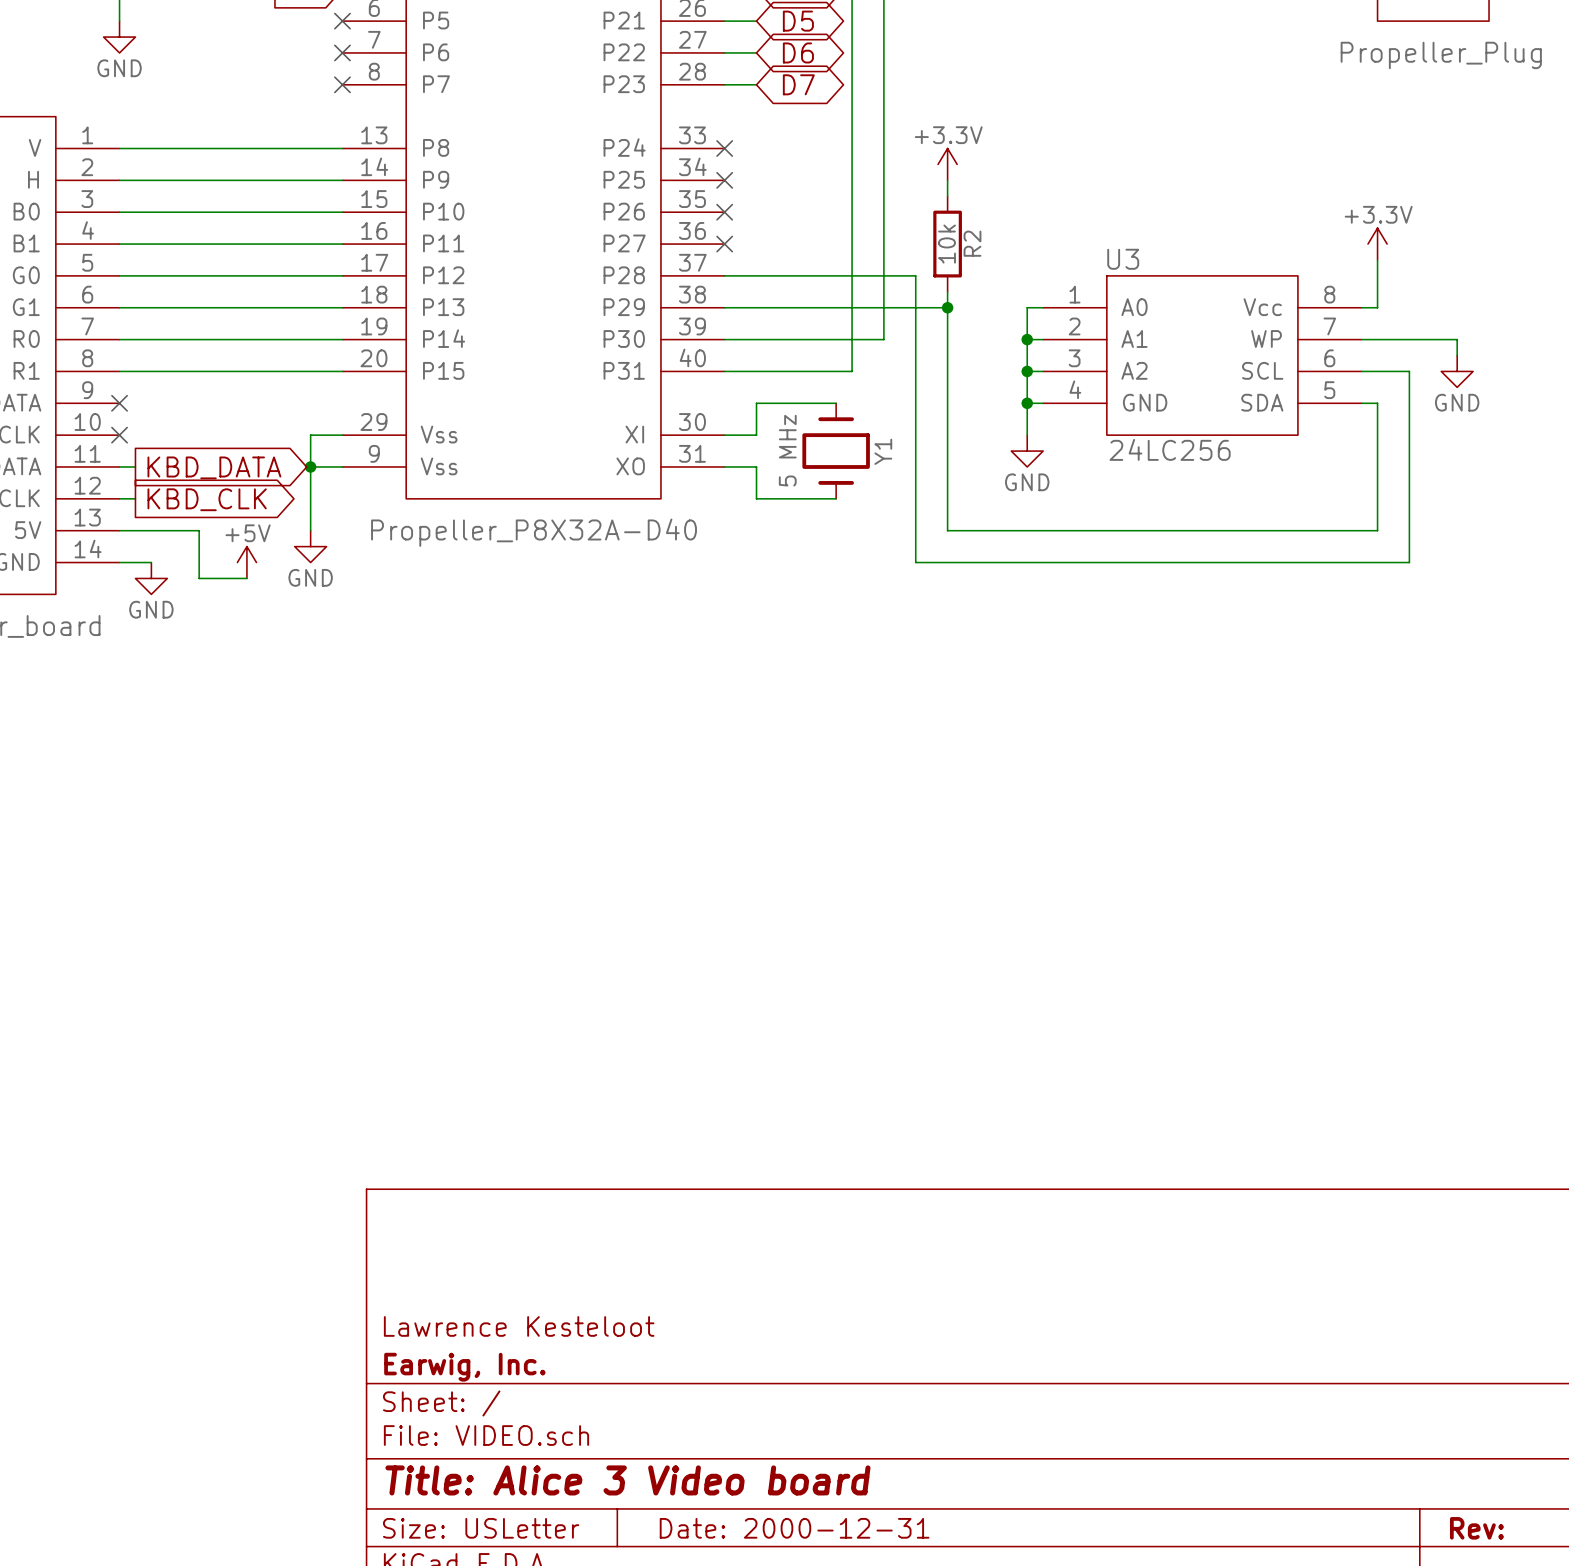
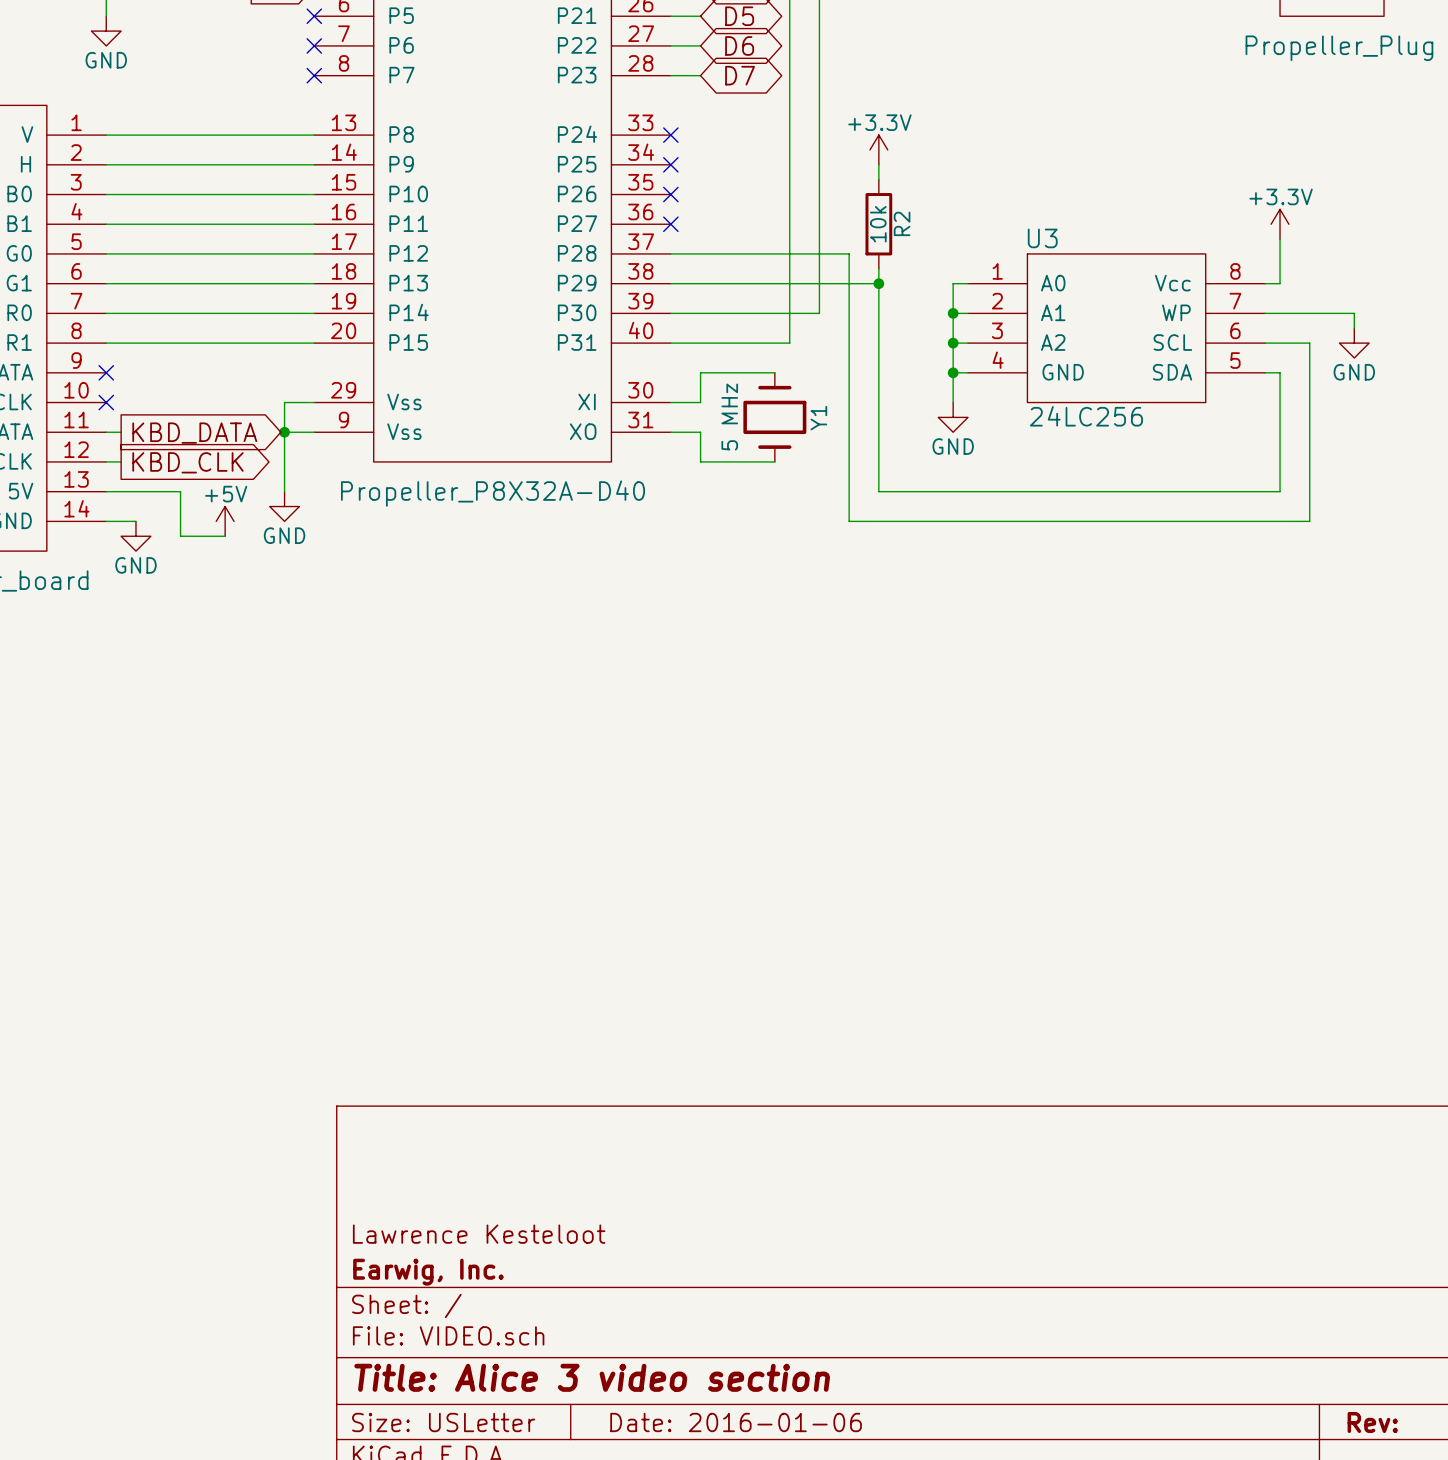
title block: Title: Alice 3 Video board (627, 1480) -> Title: Alice 3 video section (592, 1377)
title block: Date: 2000-12-31 (794, 1528) -> Date: 2016-01-06 (736, 1422)

